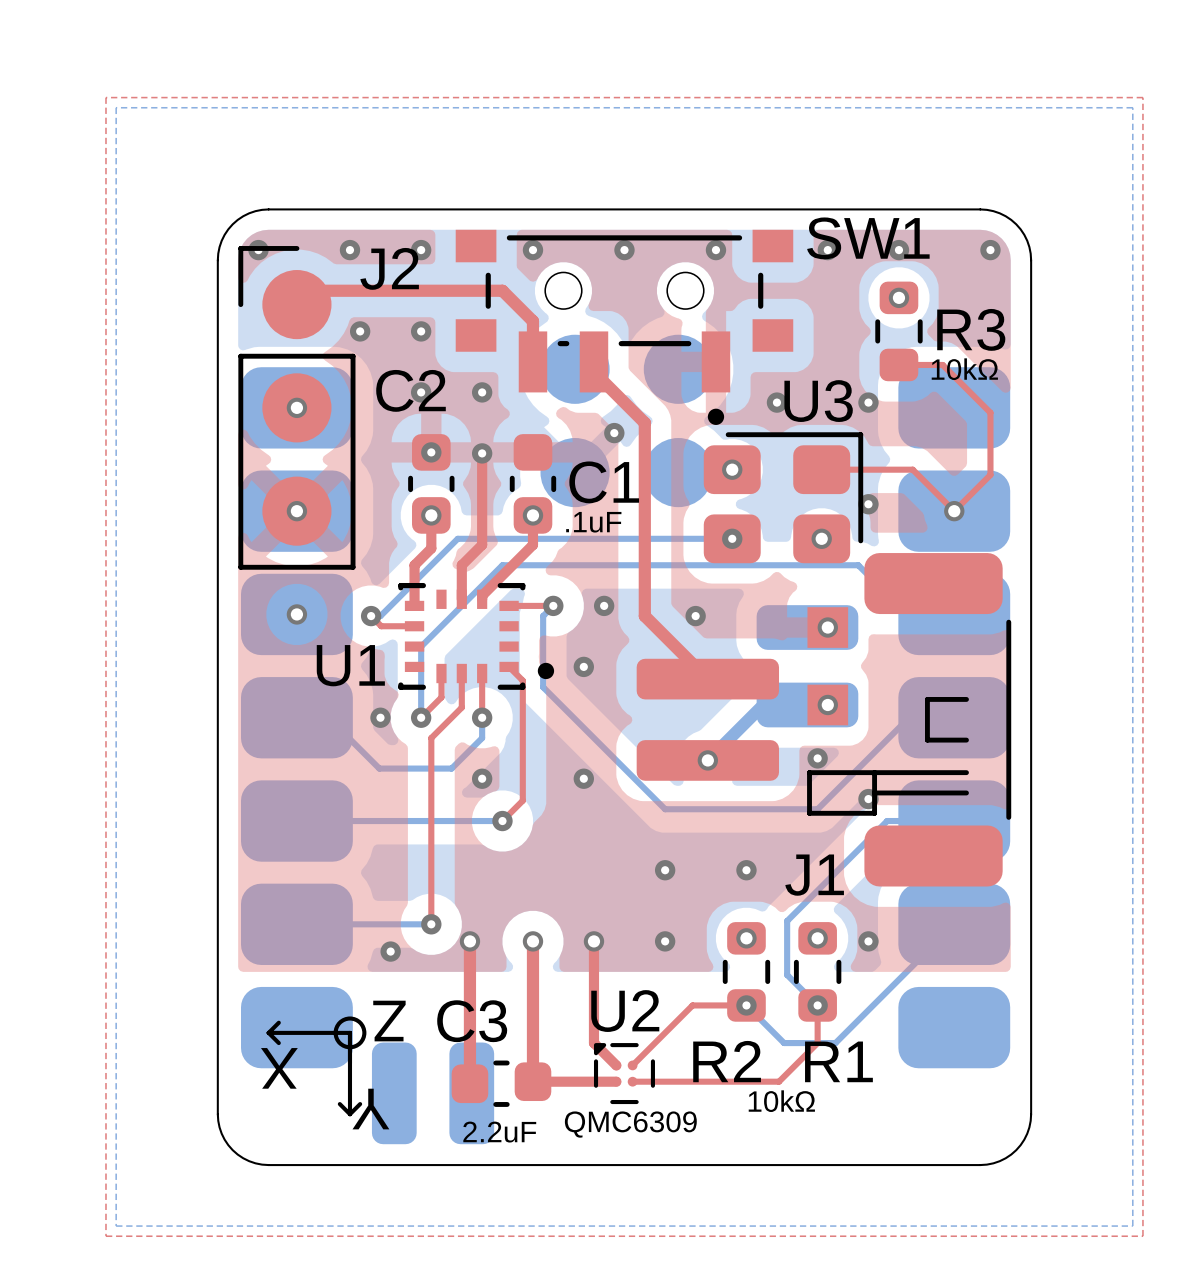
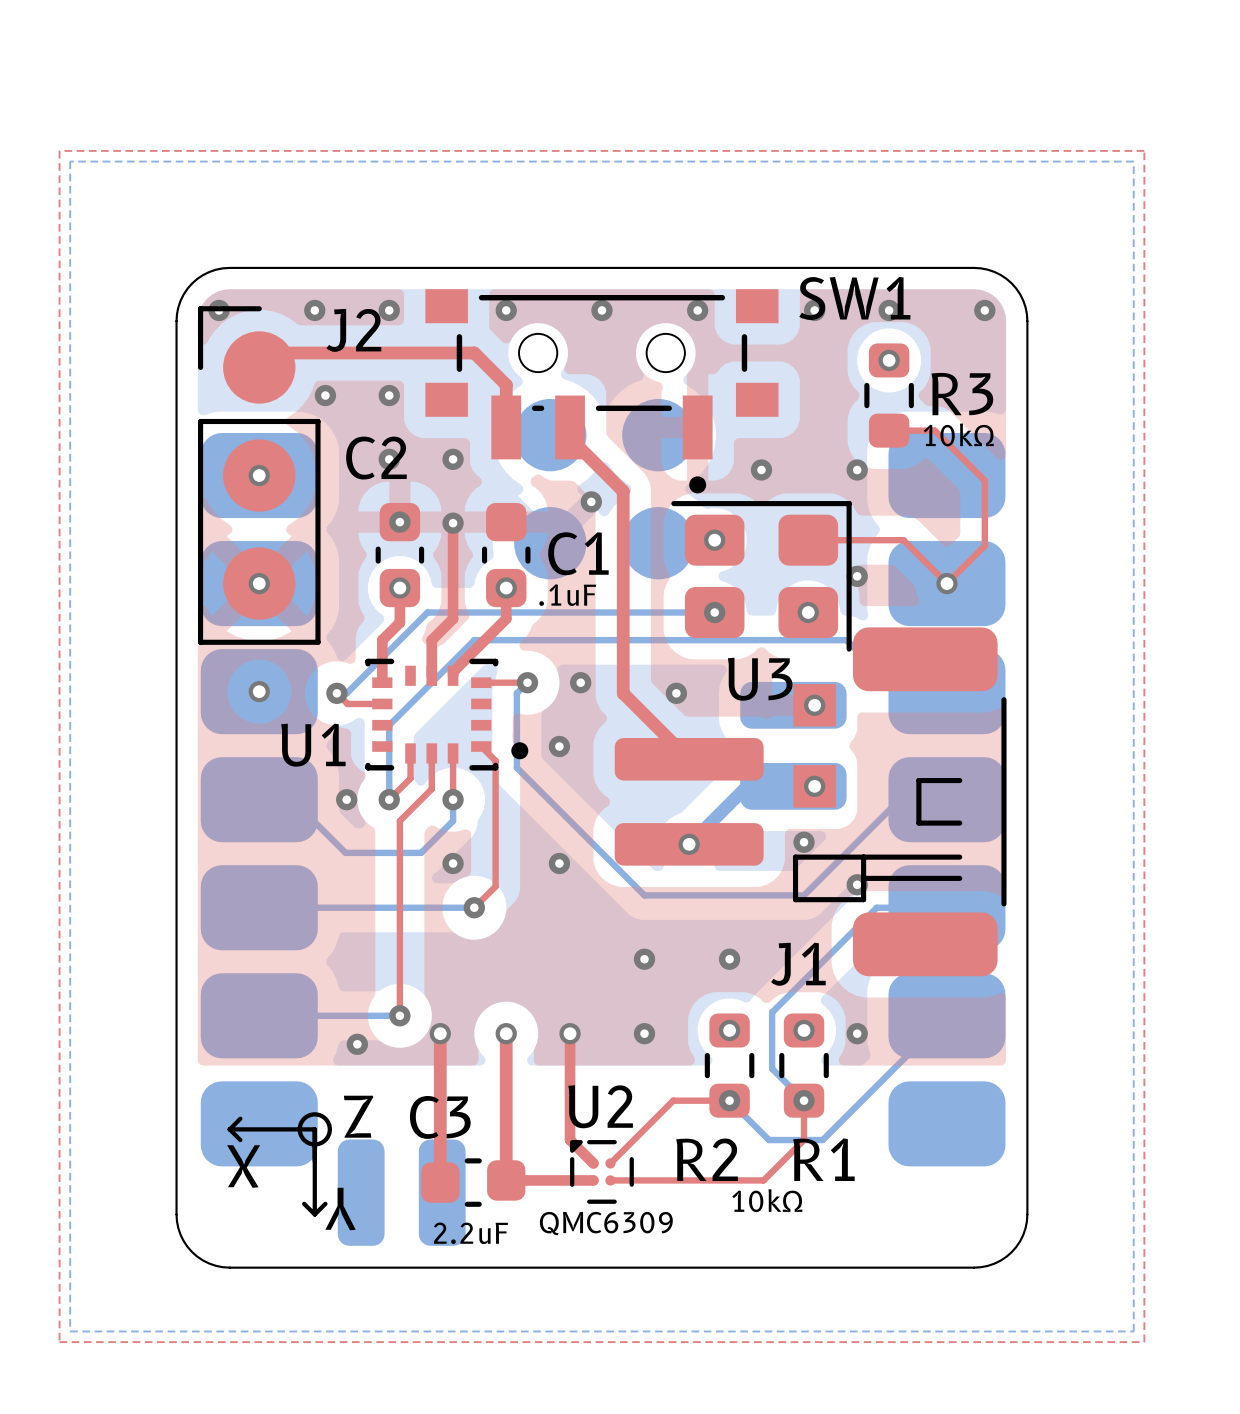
U3 name position: U3 (818, 401) -> U3 (760, 679)
U3 footprint: [703, 432, 864, 564] -> [671, 501, 852, 652]

